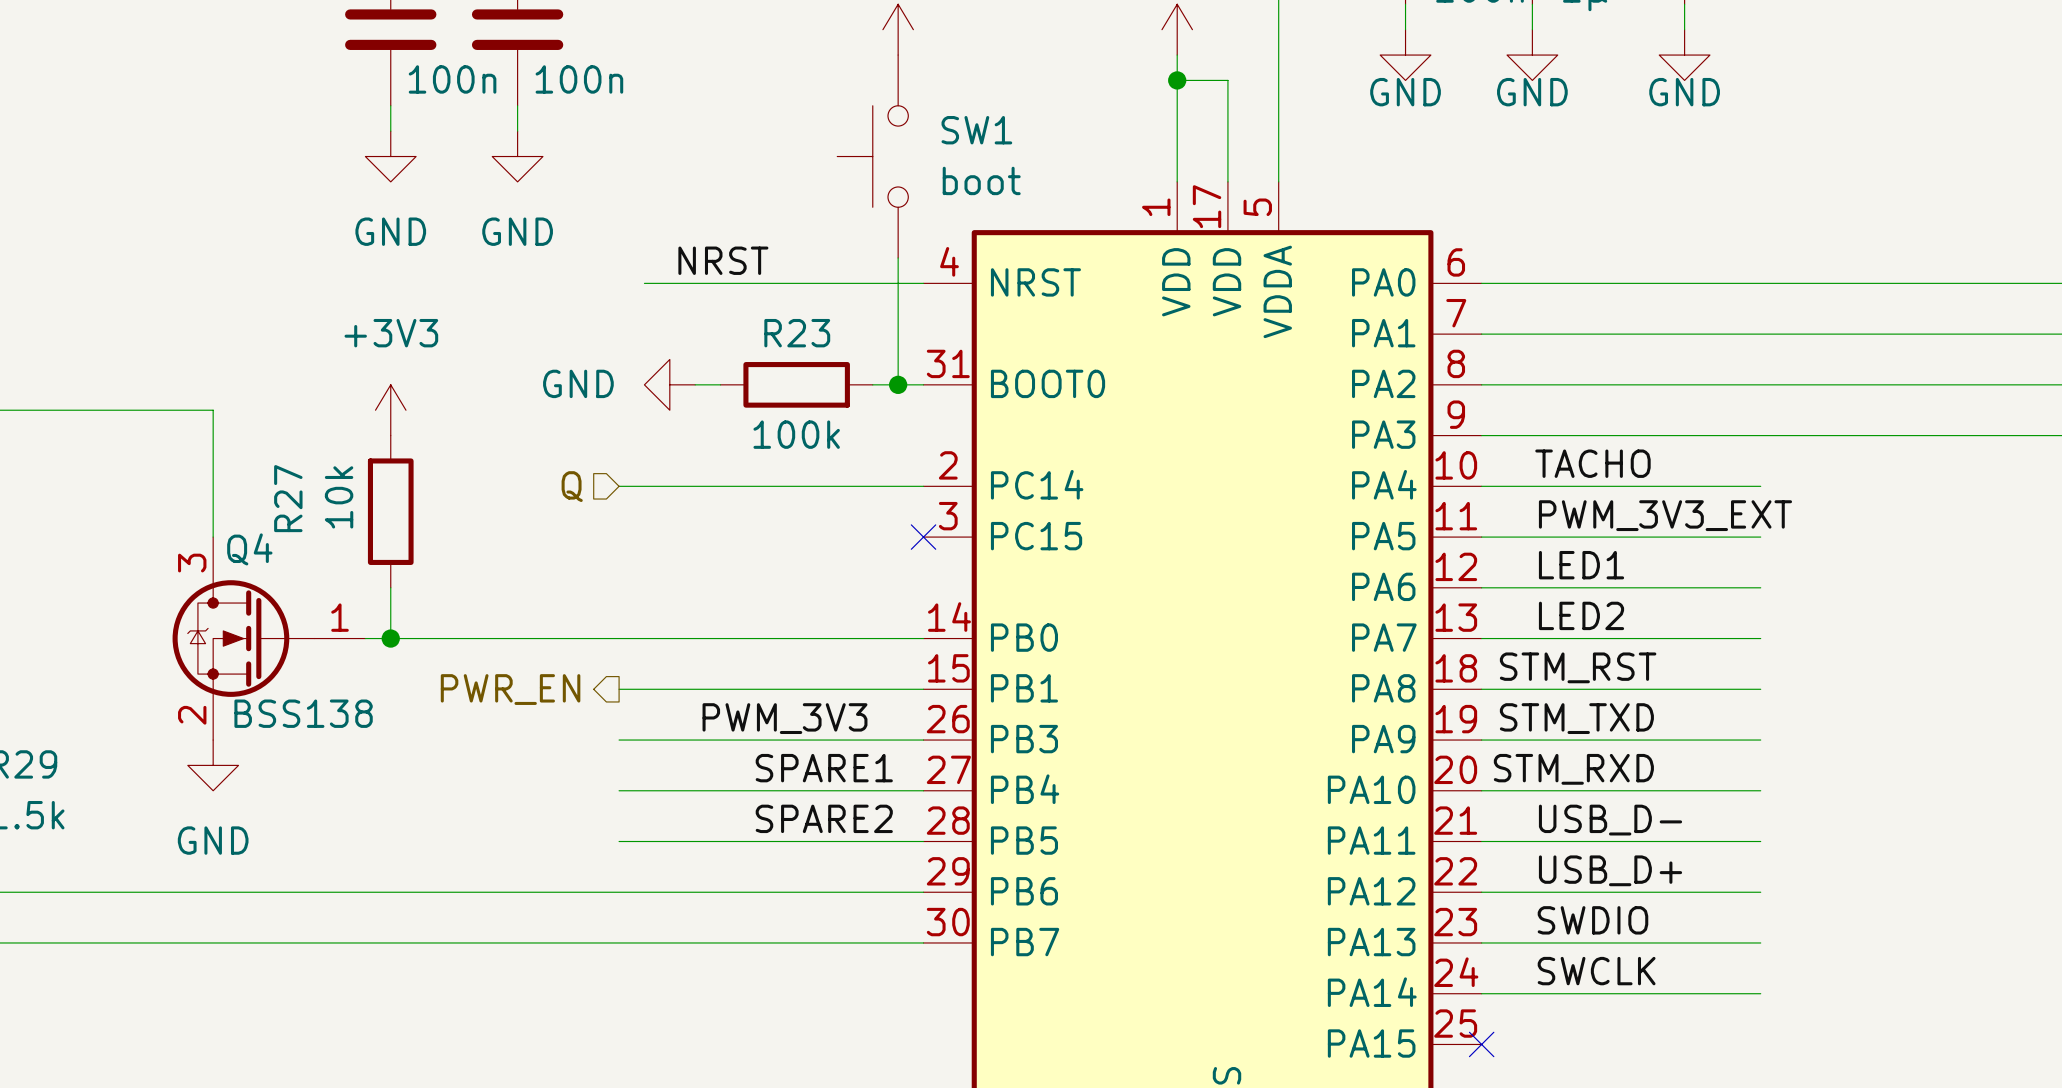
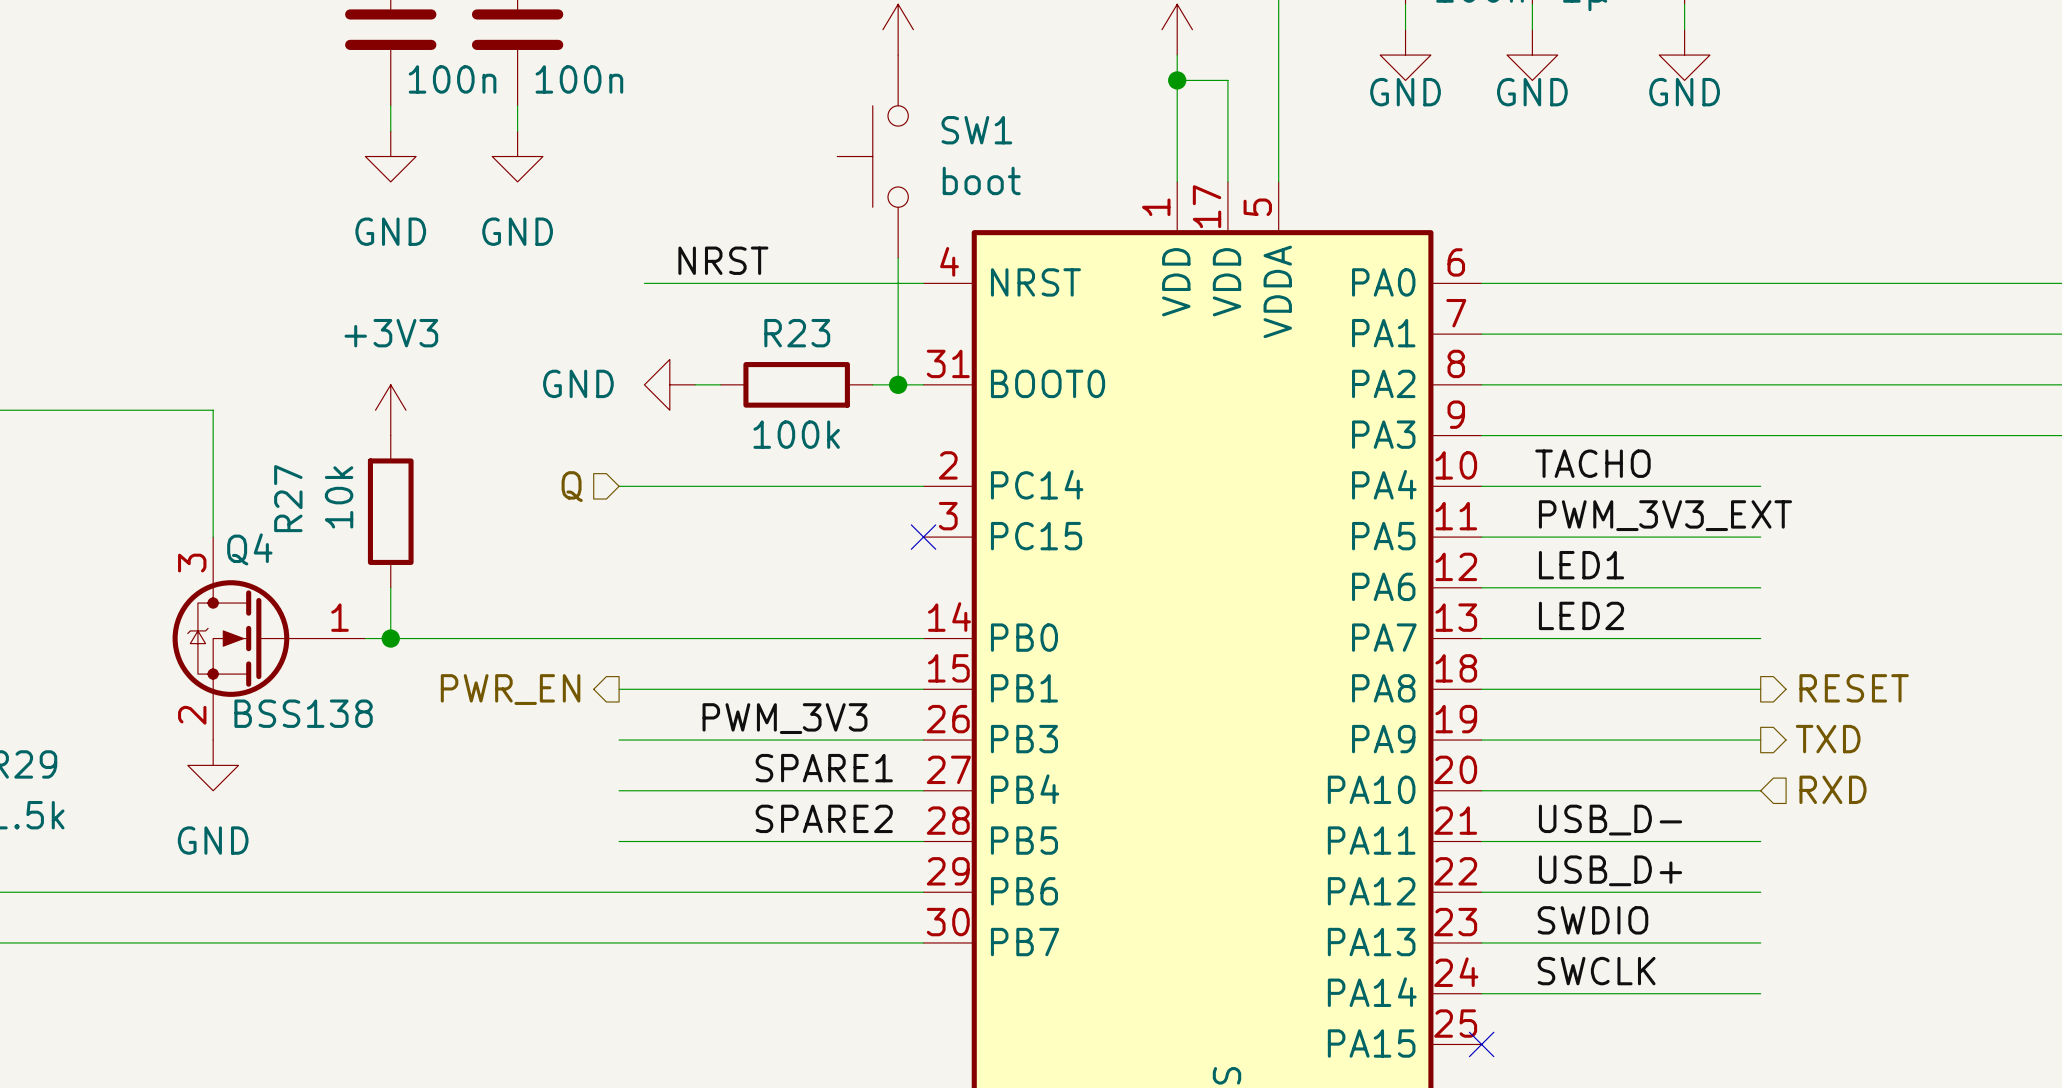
label: STM_RST (1578, 667) -> none
hierarchical label: none -> RESET (1854, 688)
label: STM_TXD (1576, 718) -> none
hierarchical label: none -> TXD (1828, 739)
label: STM_RXD (1573, 769) -> none
hierarchical label: none -> RXD (1832, 789)

